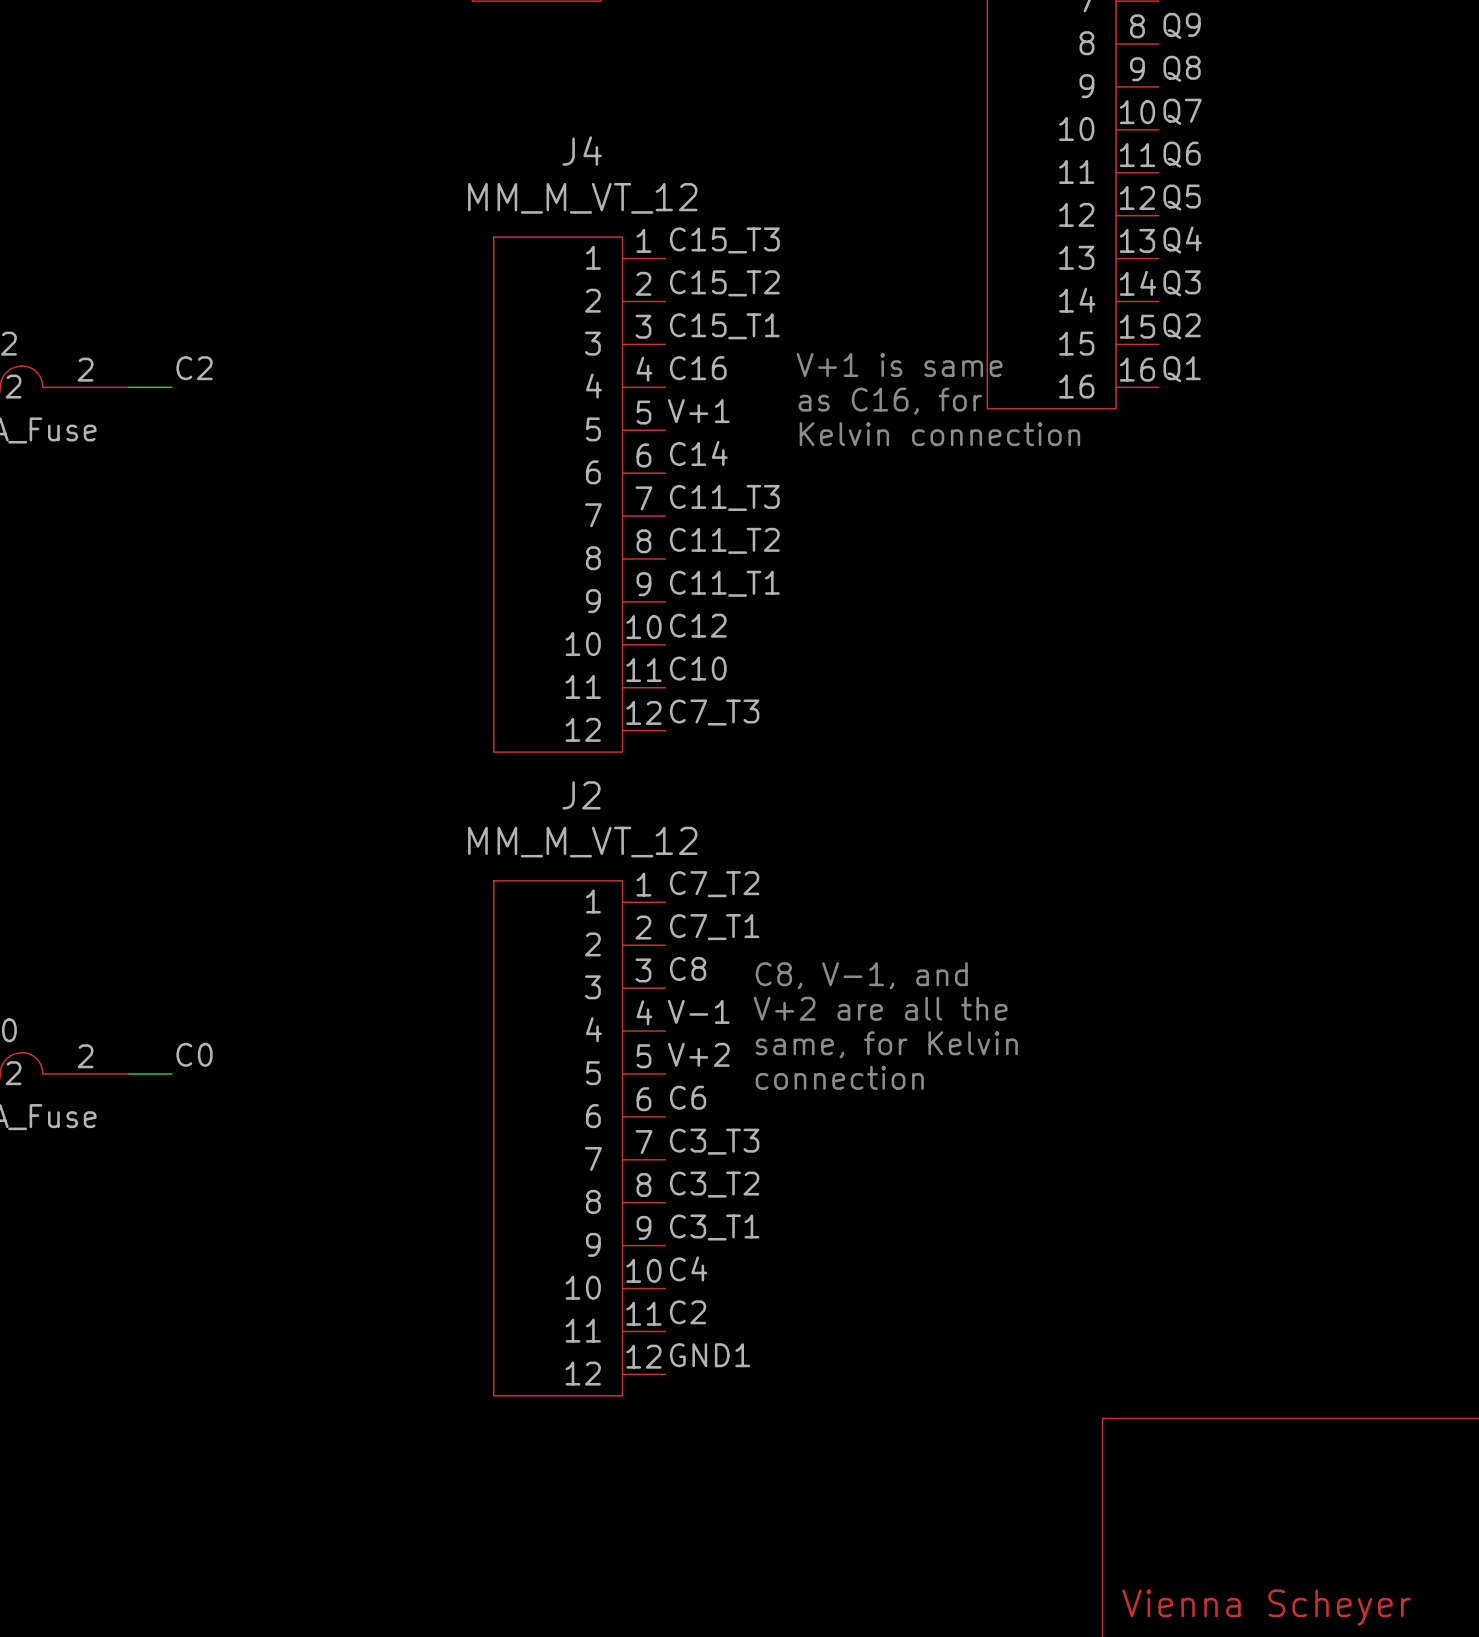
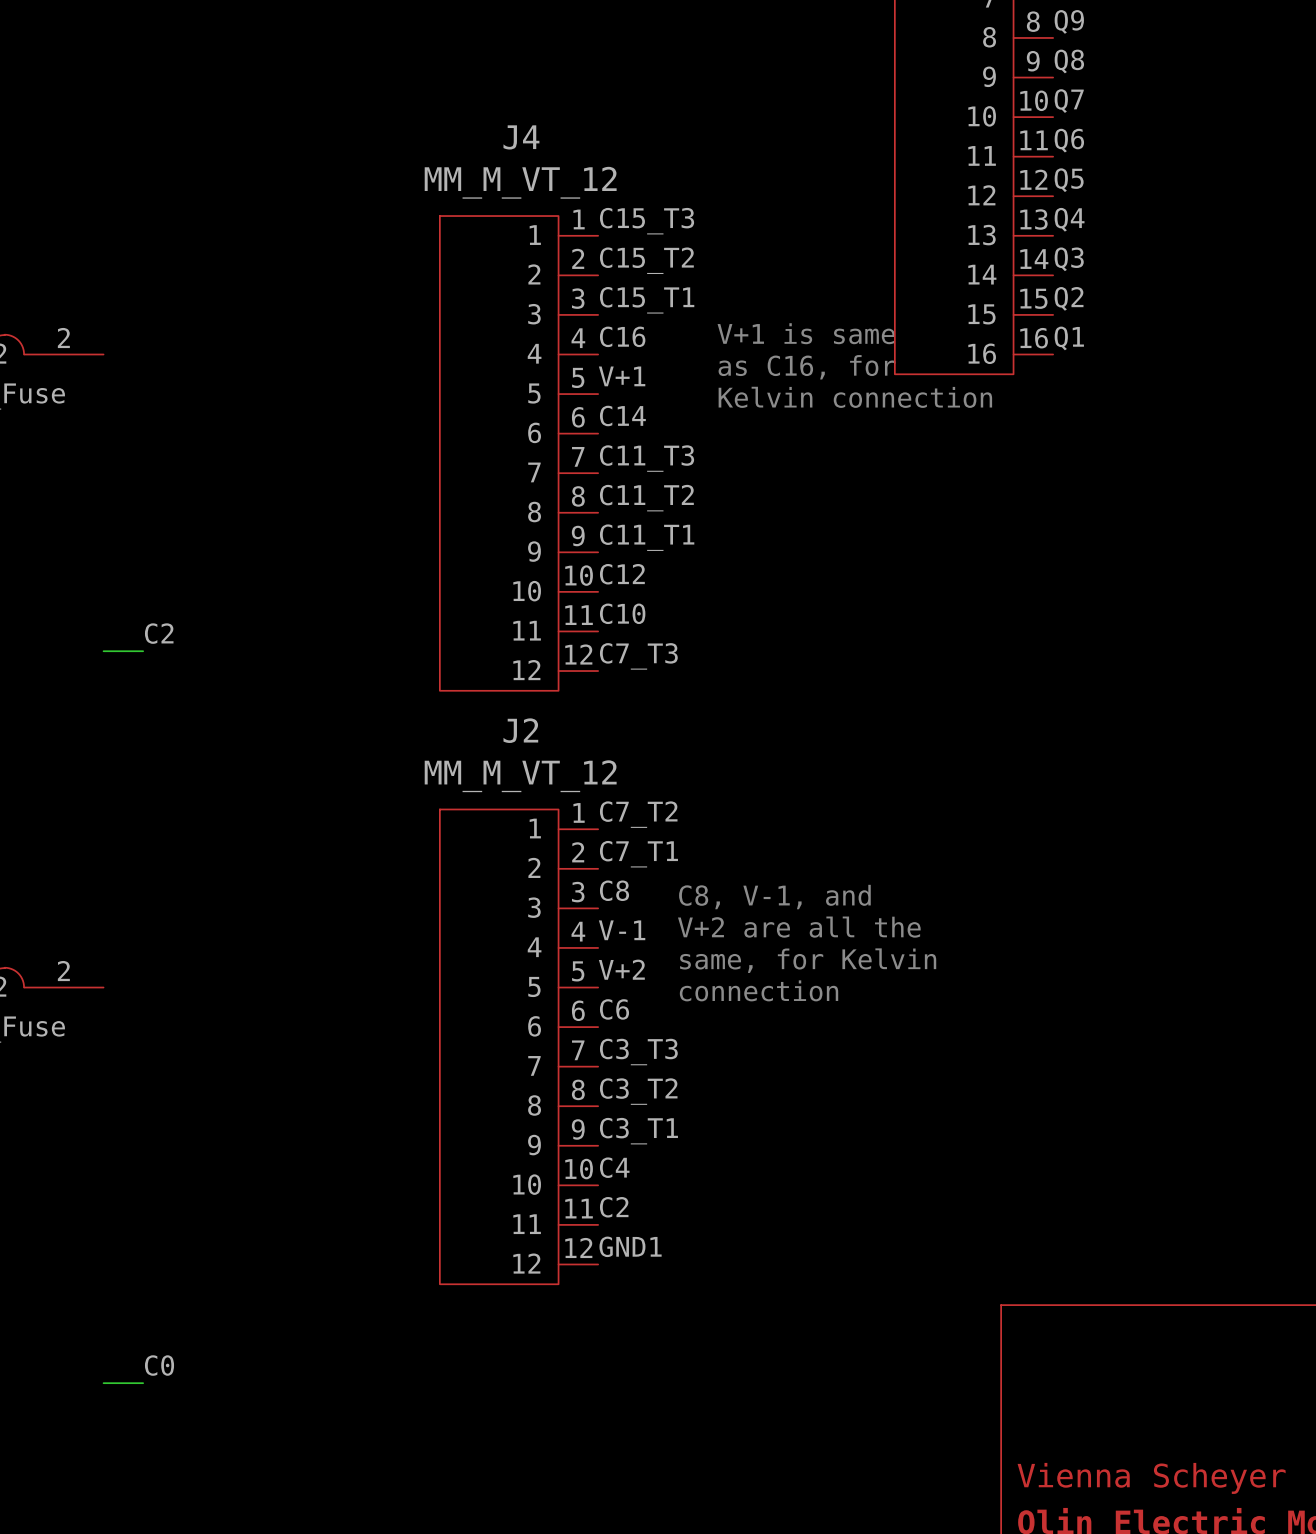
label position: C2 (194, 368) -> C2 (159, 633)
wire: (128, 387) (171, 387) -> (103, 651) (143, 651)
label: C0 (194, 1054) -> none
wire: (128, 1073) (171, 1073) -> none
label: none -> C0 (159, 1365)
wire: none -> (103, 1383) (143, 1383)

